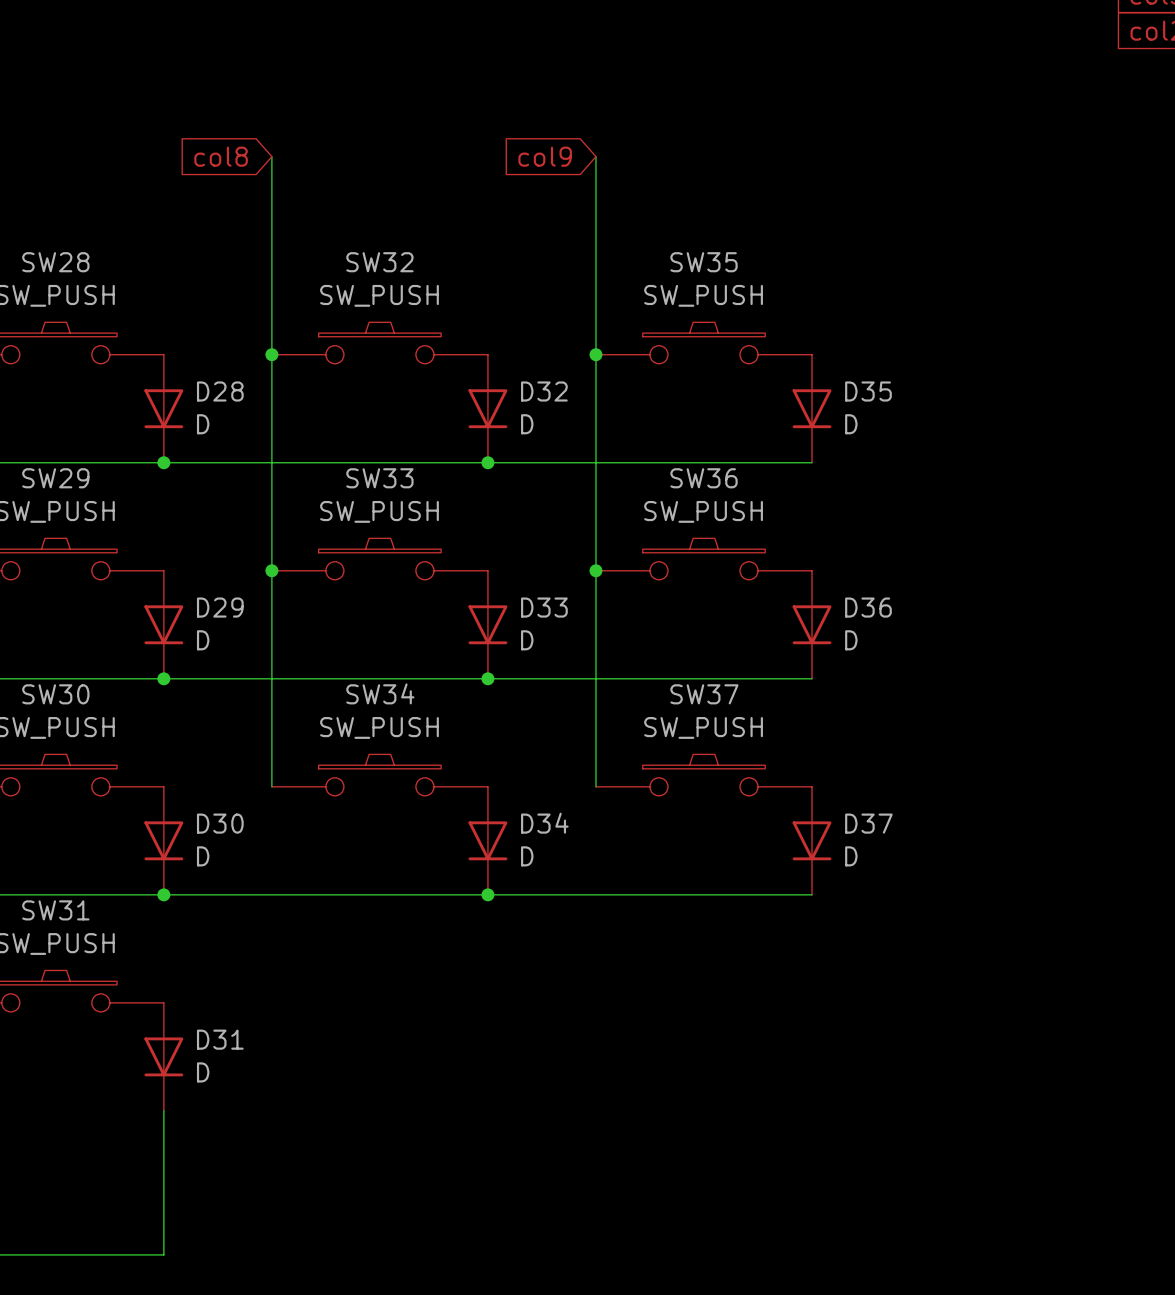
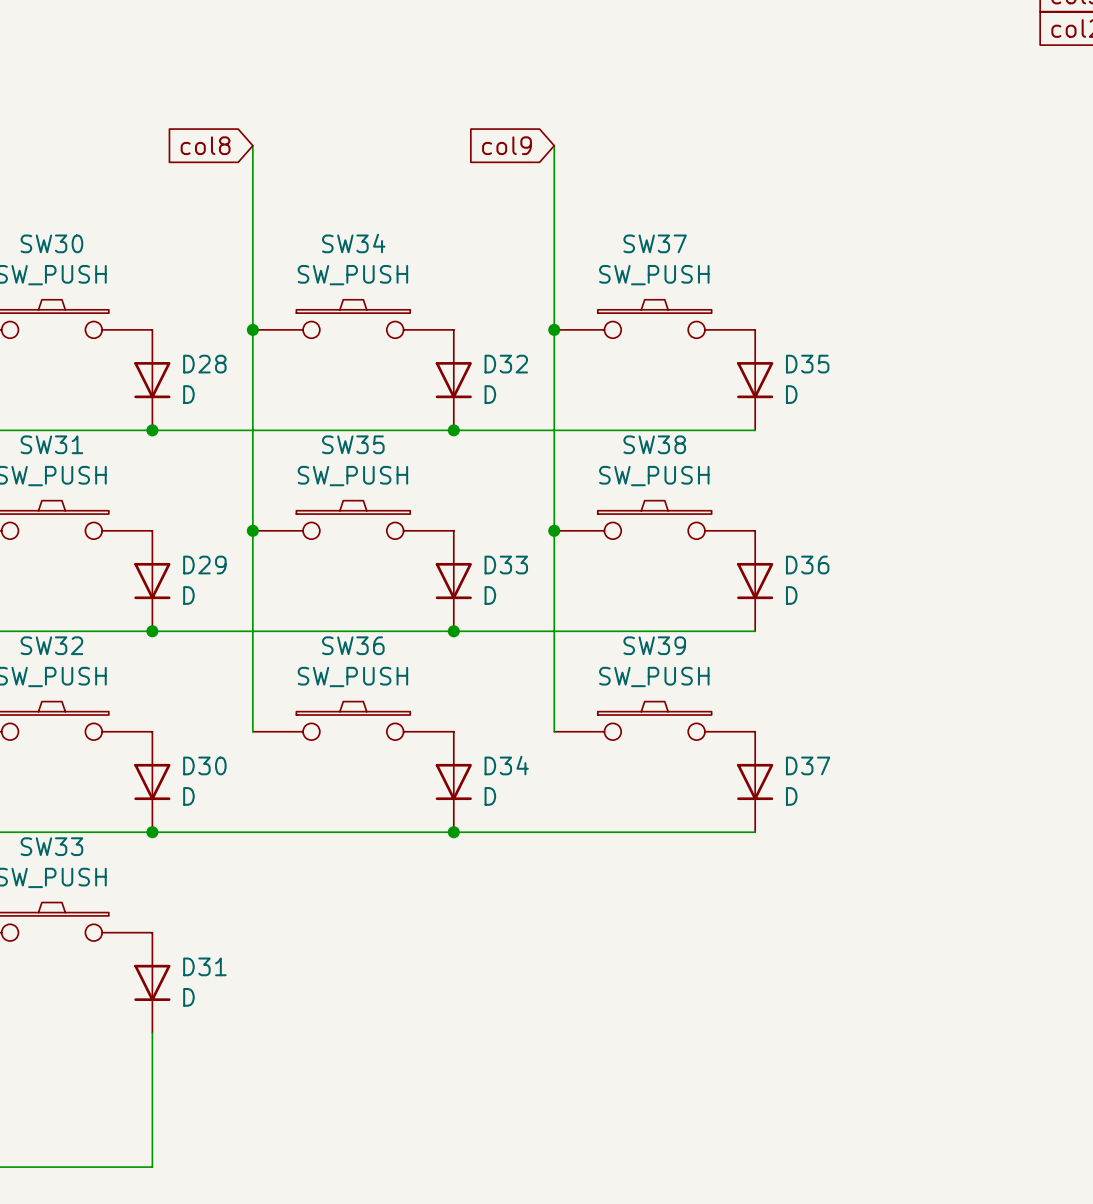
SW28 name: SW28 (55, 262) -> SW30 (51, 243)
SW32 name: SW32 (379, 262) -> SW34 (353, 243)
SW35 name: SW35 (704, 262) -> SW37 (655, 243)
SW29 name: SW29 (55, 478) -> SW31 (51, 444)
SW33 name: SW33 (379, 478) -> SW35 (353, 444)
SW36 name: SW36 (704, 478) -> SW38 (654, 444)
SW34 name: SW34 (380, 693) -> SW36 (353, 645)
SW30 name: SW30 (55, 694) -> SW32 (51, 645)
SW37 name: SW37 (704, 694) -> SW39 (654, 645)
SW31 name: SW31 (55, 910) -> SW33 (51, 846)

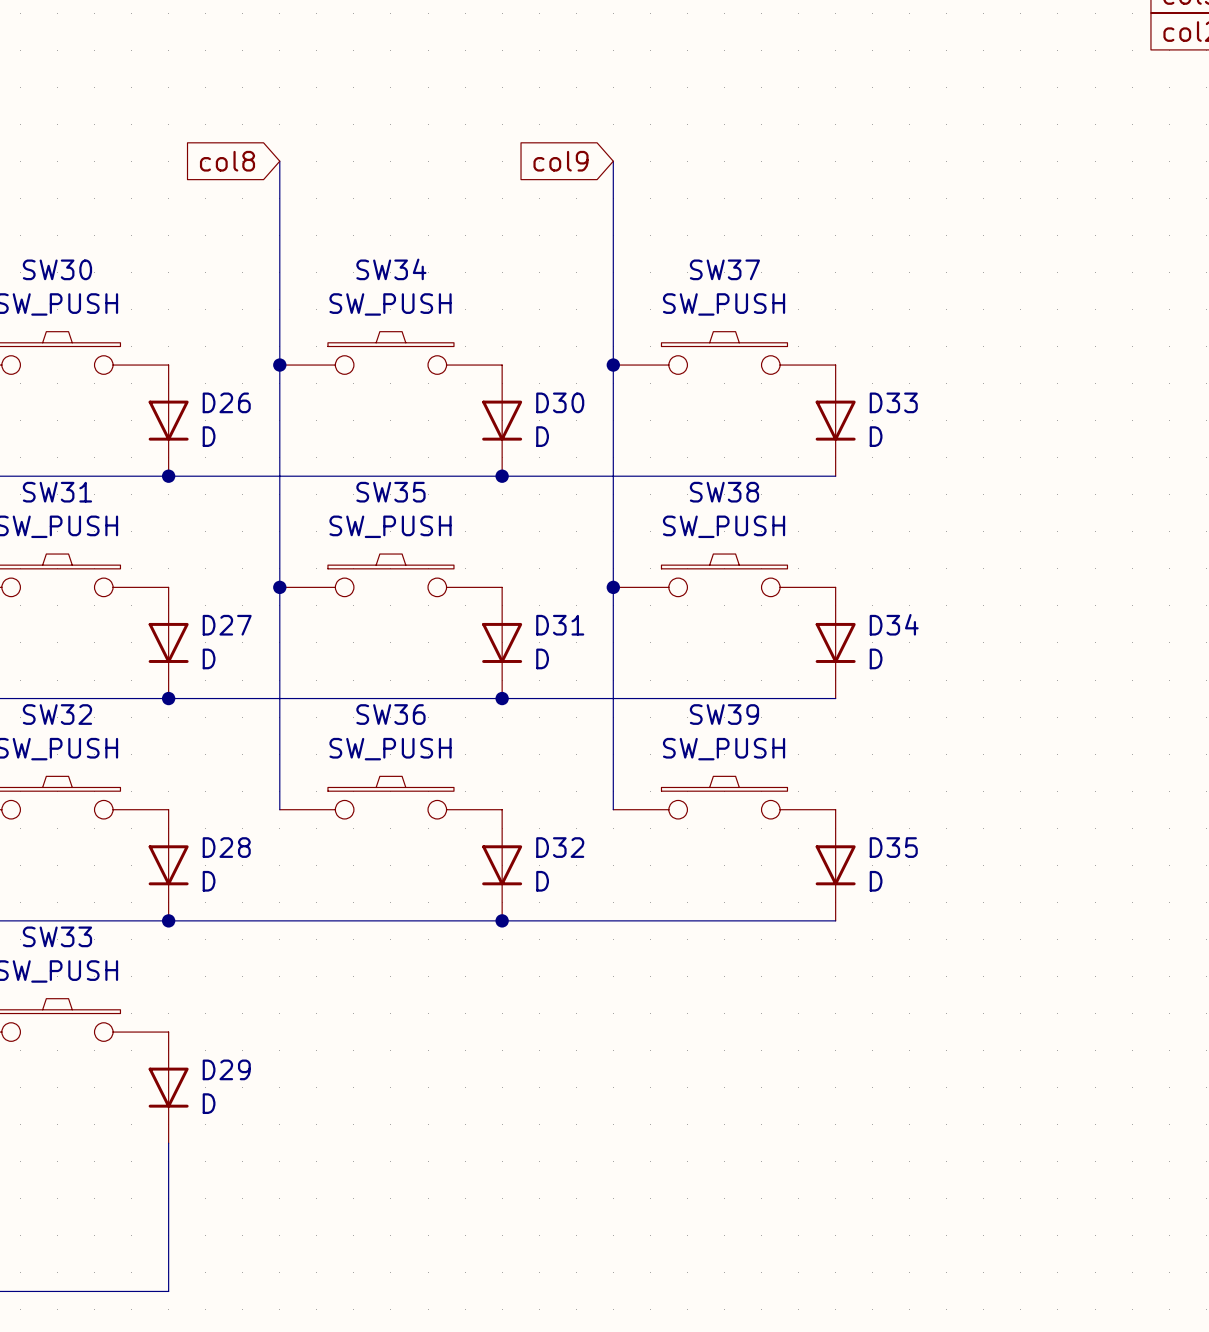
D28 name: D28 (204, 364) -> D26 (226, 402)
D32 name: D32 (506, 364) -> D30 (560, 402)
D35 name: D35 (807, 364) -> D33 (893, 402)
D29 name: D29 (204, 565) -> D27 (227, 625)
D33 name: D33 (506, 565) -> D31 (560, 625)
D36 name: D36 (807, 565) -> D34 (894, 624)
D30 name: D30 (204, 765) -> D28 (226, 847)
D34 name: D34 (506, 765) -> D32 (560, 847)
D37 name: D37 (808, 765) -> D35 (893, 847)
D31 name: D31 (204, 966) -> D29 (226, 1069)

